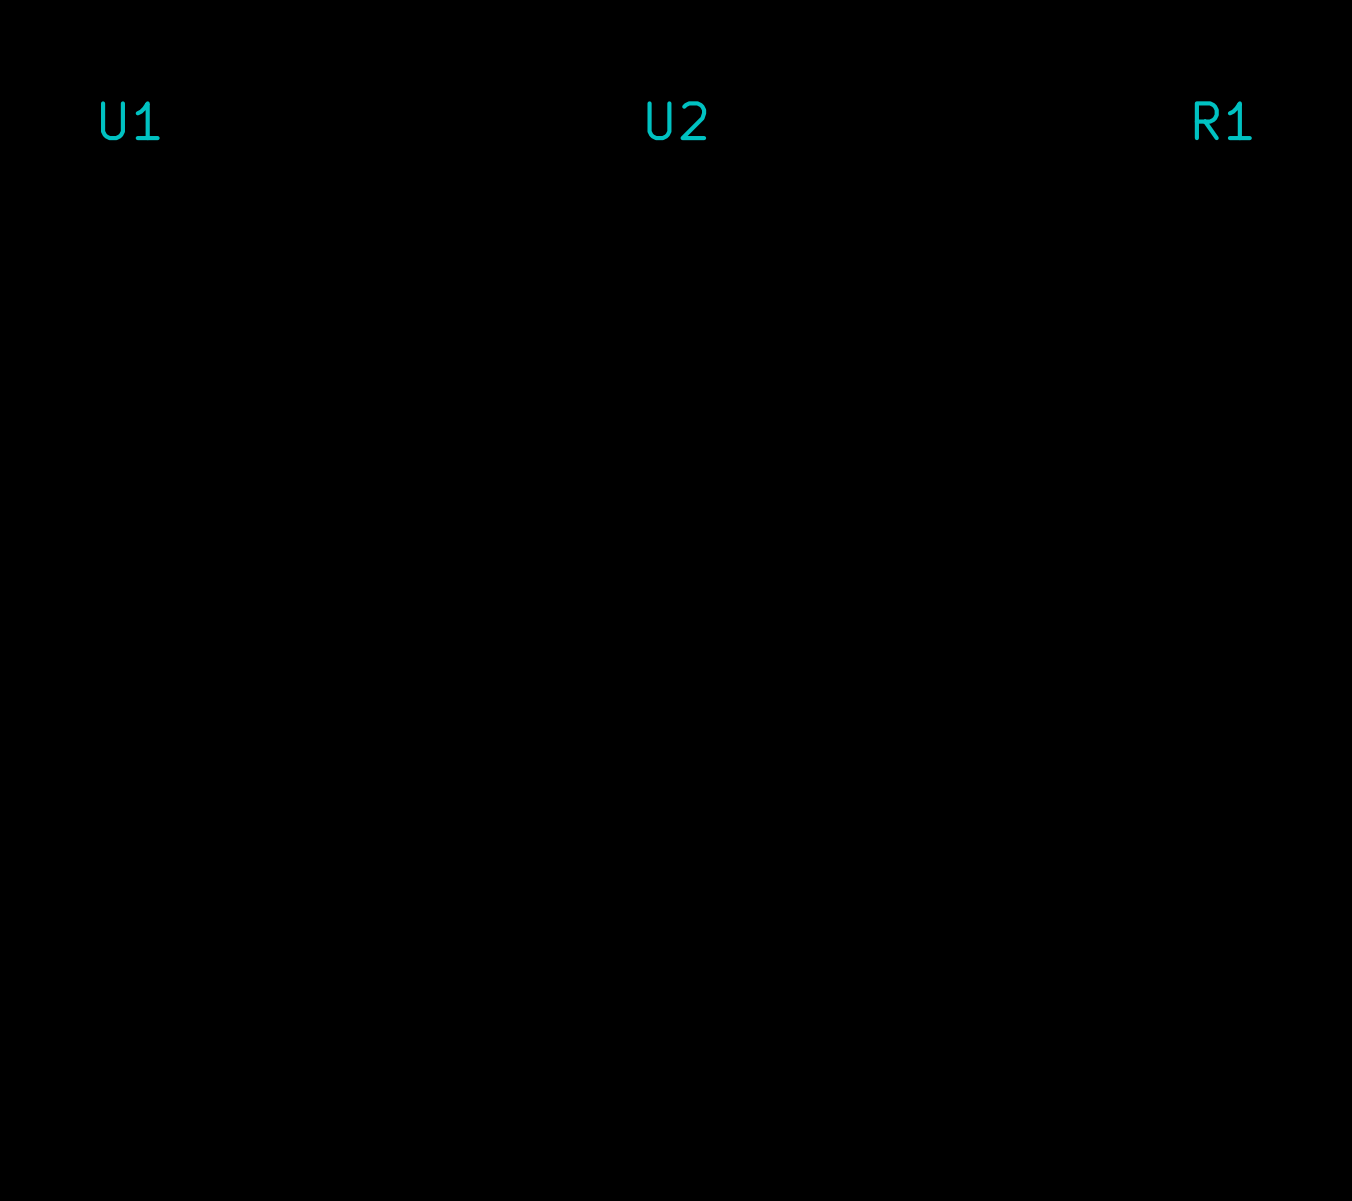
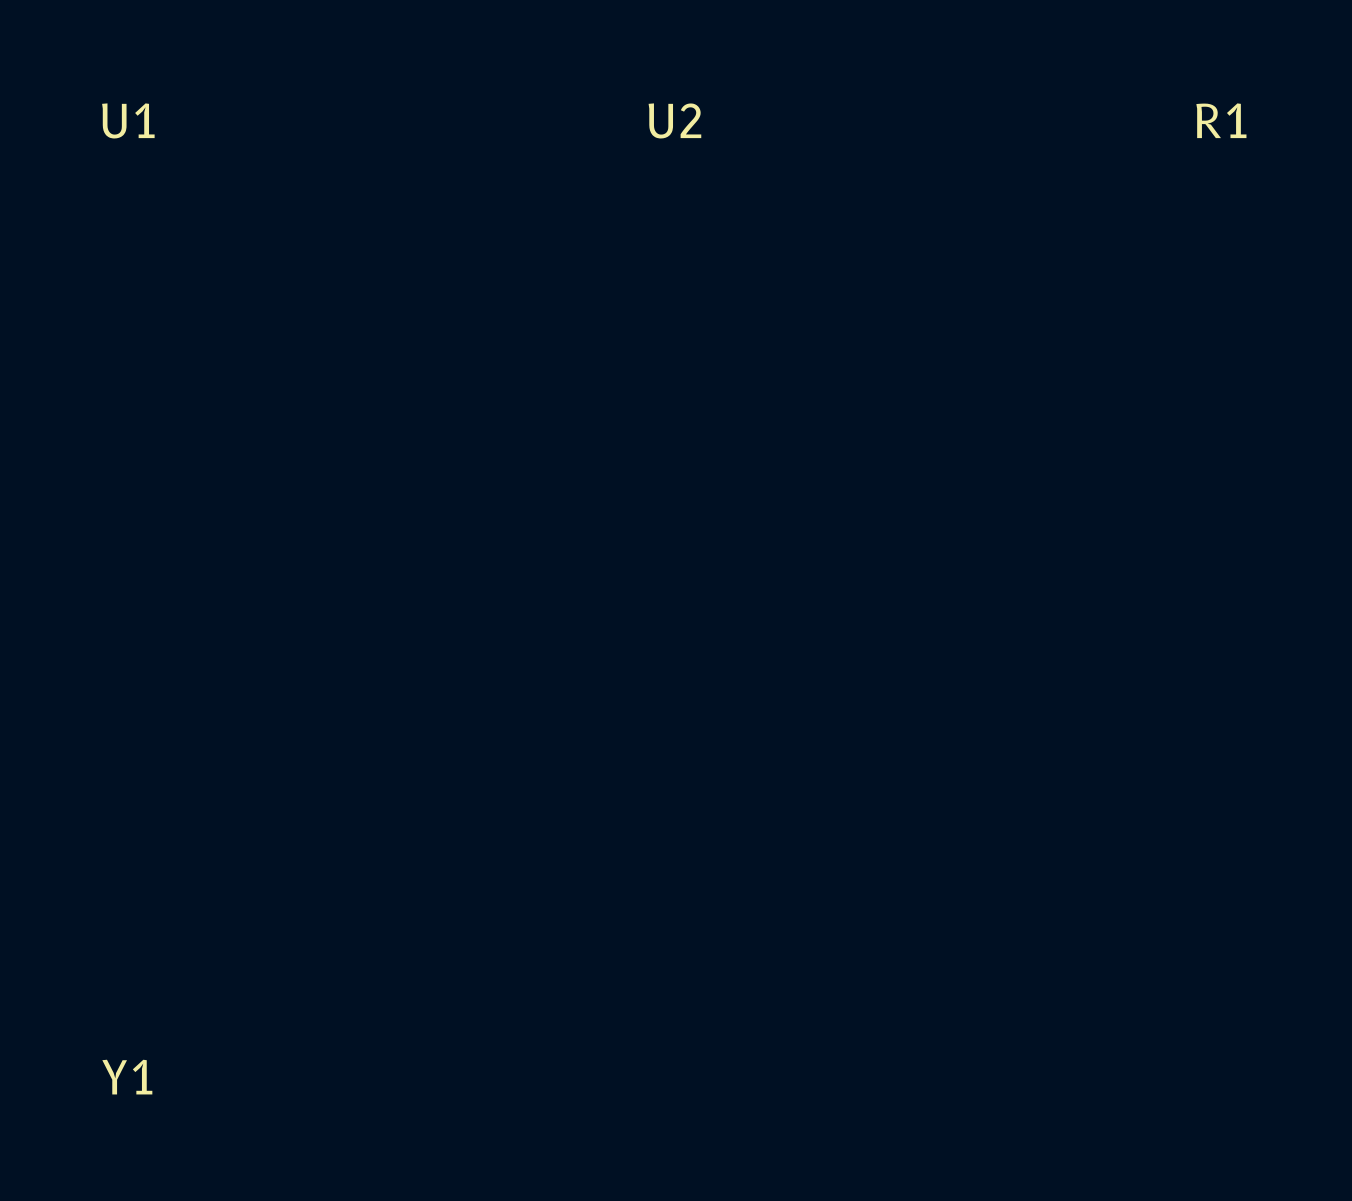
Y1: none -> (127, 1077)

